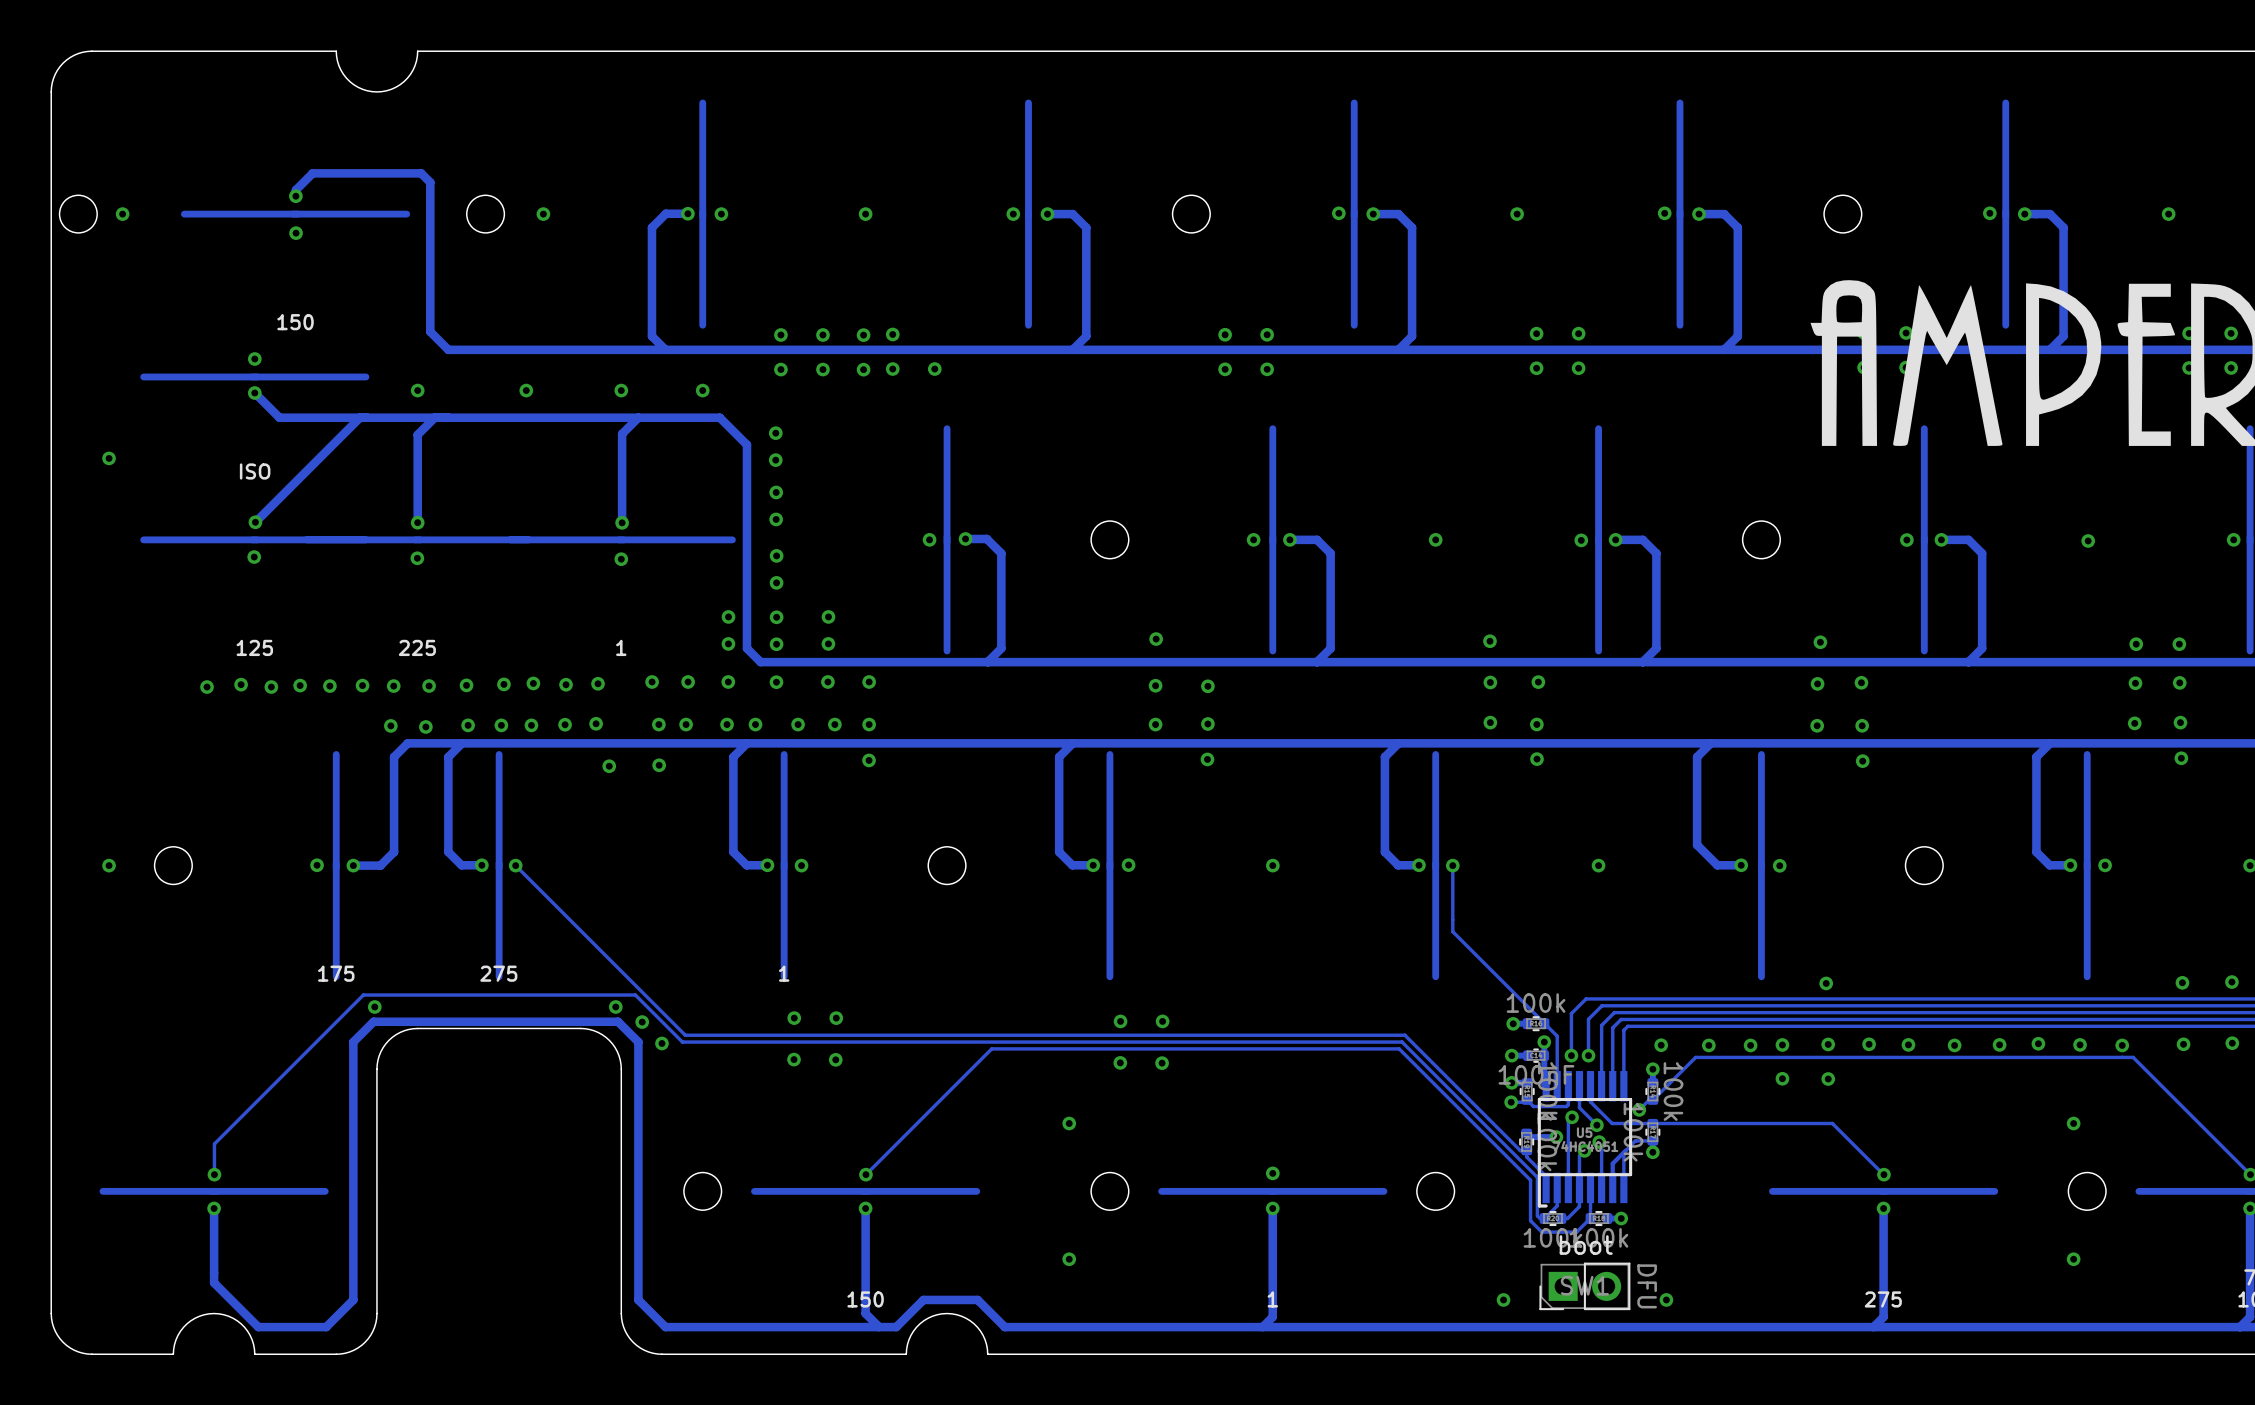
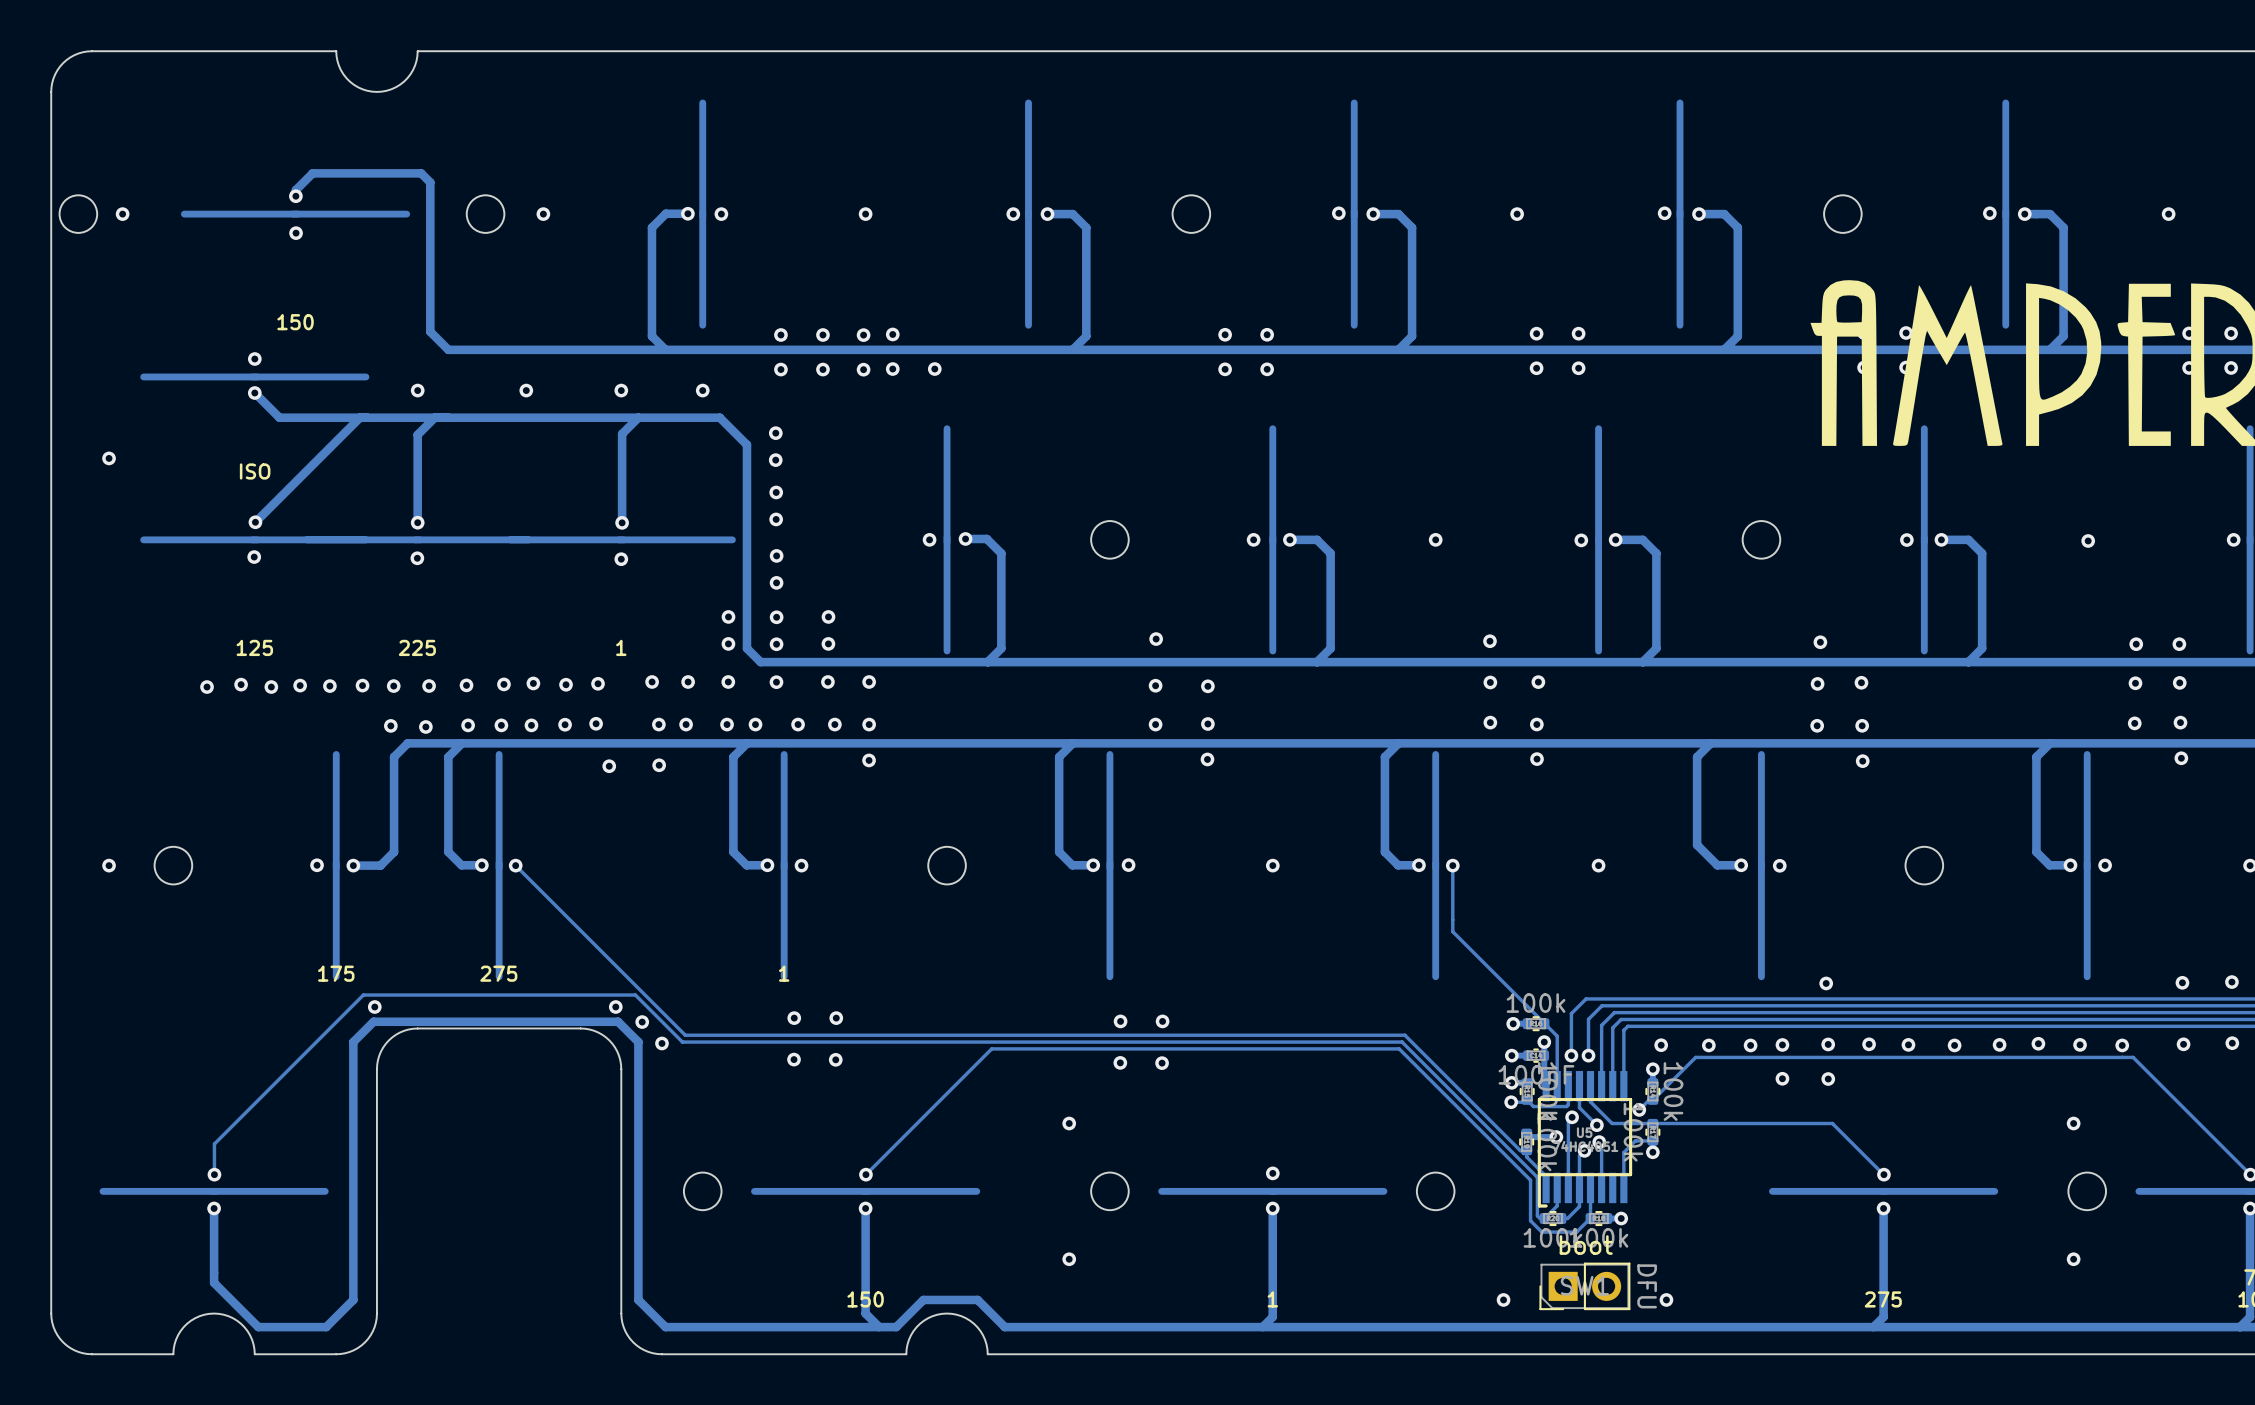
track: (1625, 1150) (1612, 1163) (1612, 1187) -> none

